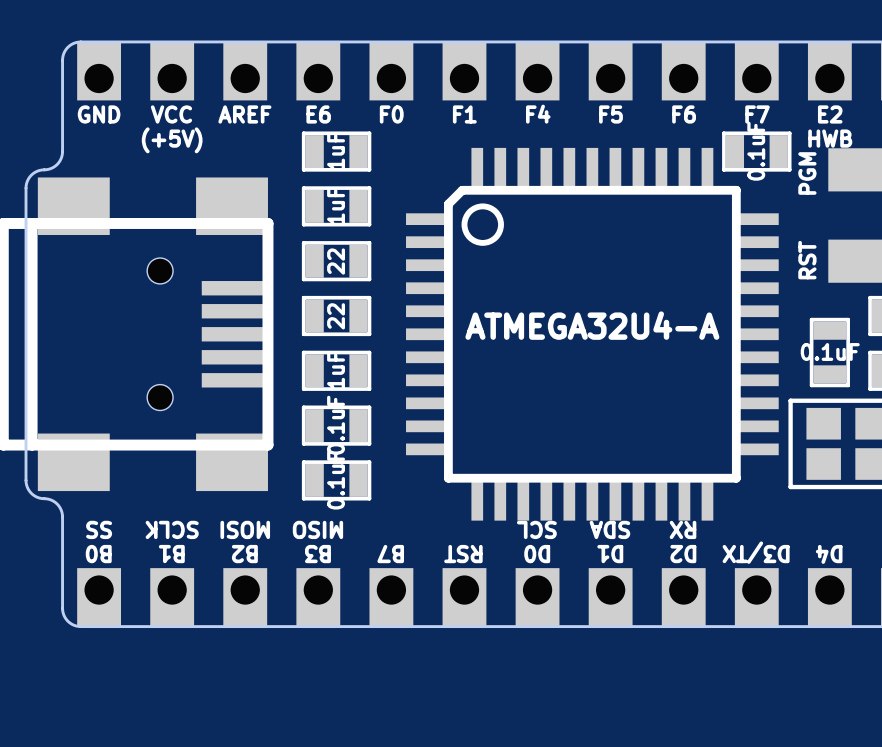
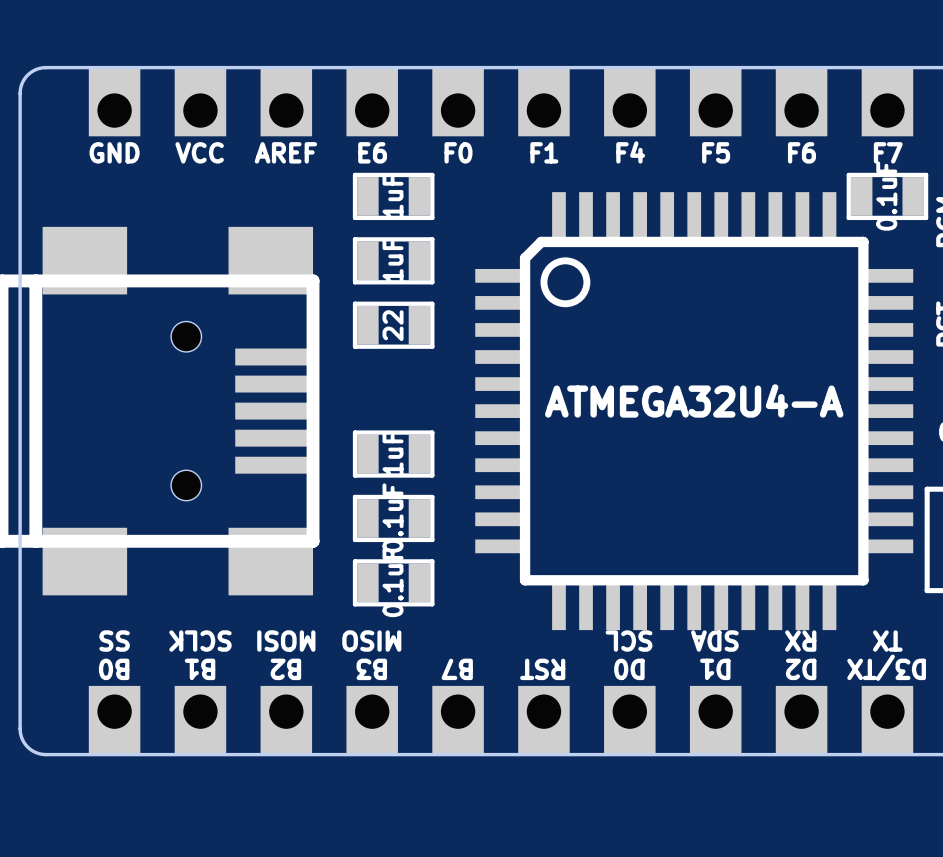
board edge: (80, 41) (67, 47) (62, 57) (61, 156) (55, 166) (44, 169) -> none
text: (+5V) (172, 140) -> none
board edge: (44, 169) (31, 175) (26, 188) (26, 482) (33, 494) (53, 501) (61, 509) (62, 610) (69, 622) (80, 626) -> (93, 67) (45, 67) (36, 69) (23, 80) (20, 93) (20, 732) (27, 747) (39, 753) (93, 754)
part: 22 (336, 315) -> none
text: none -> TX (887, 641)

